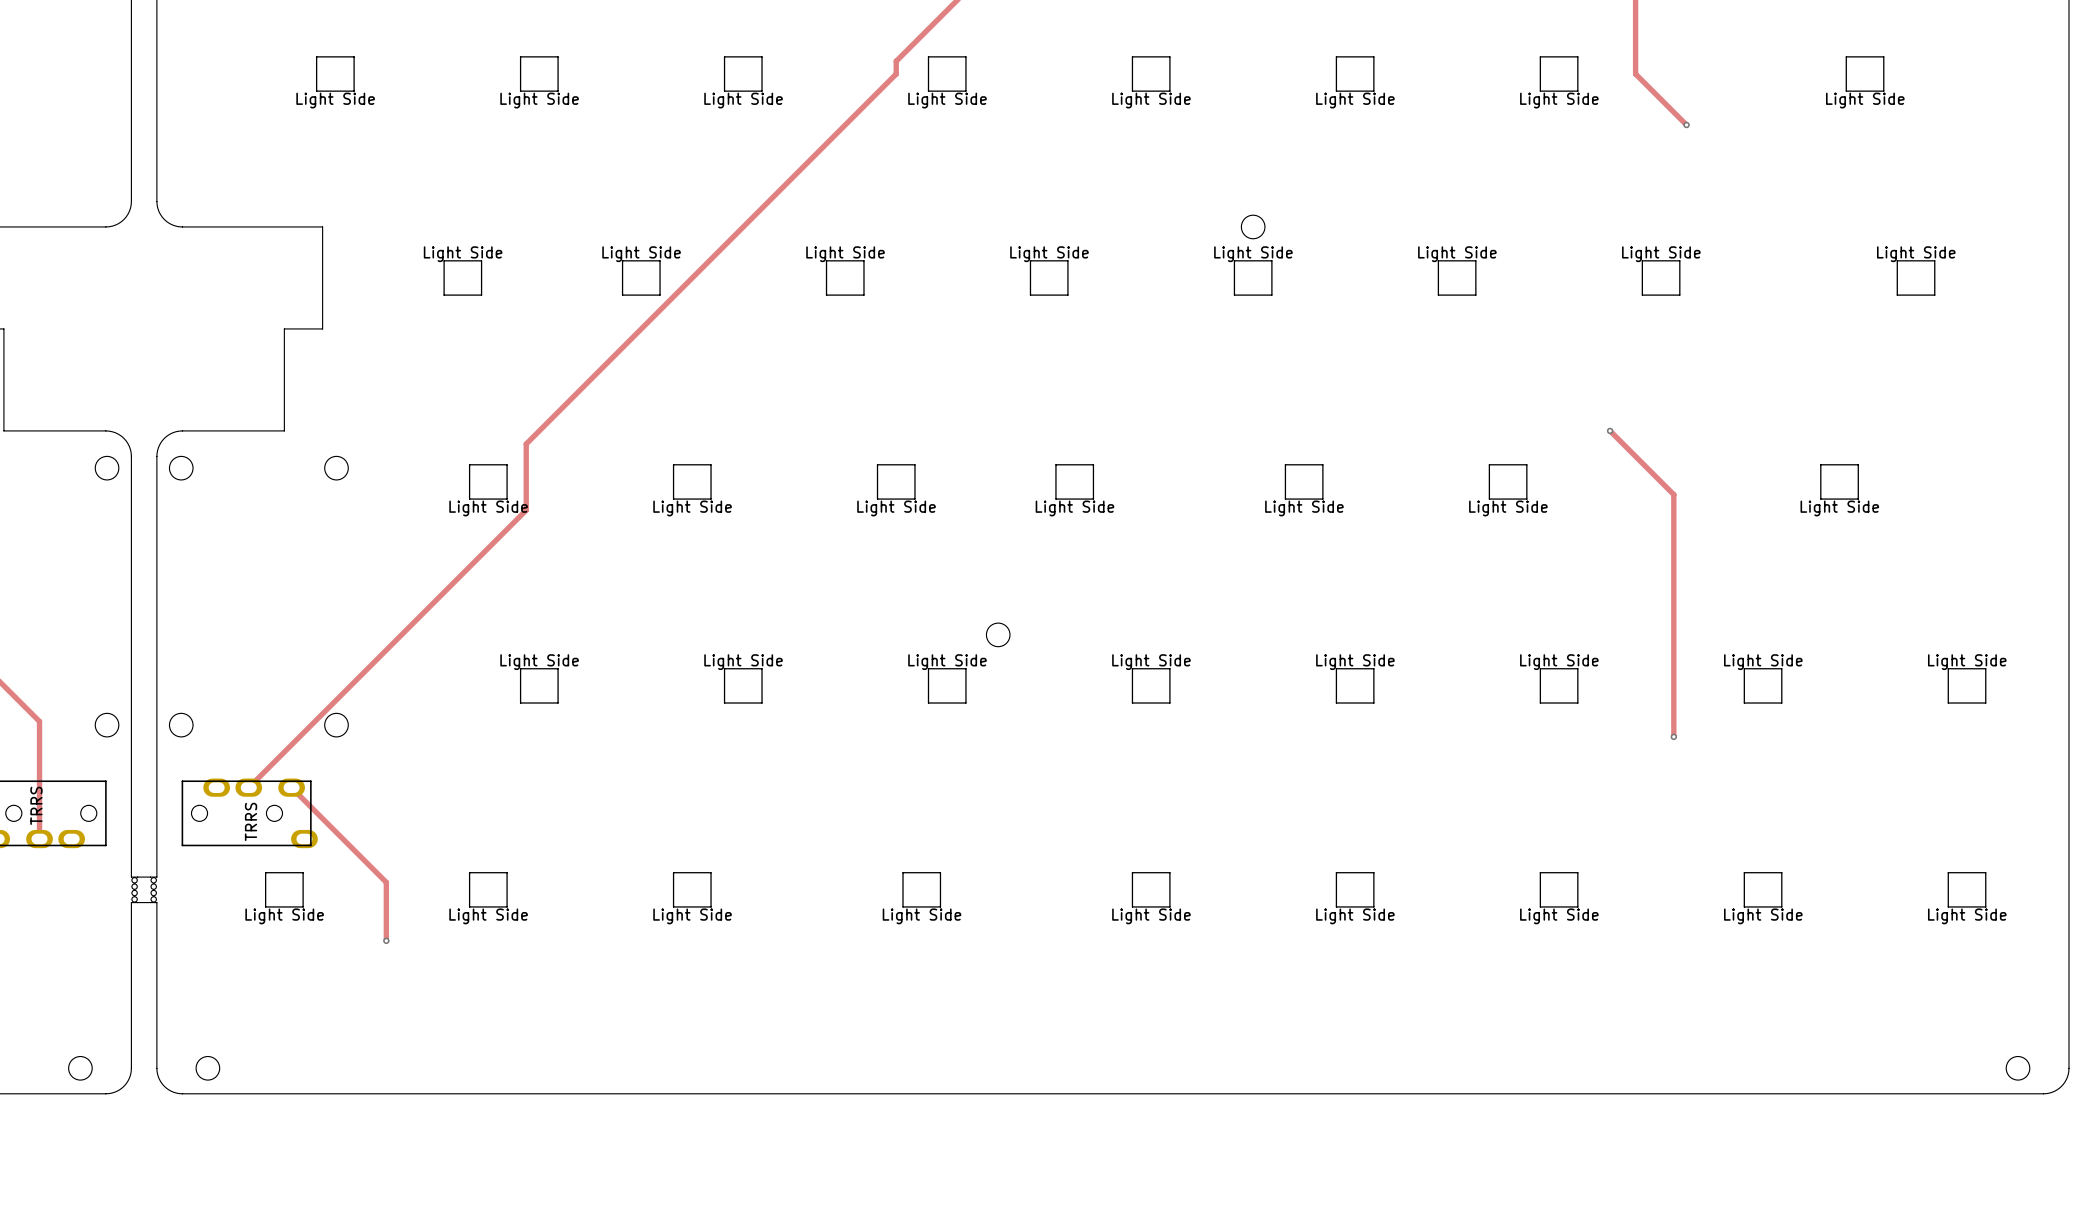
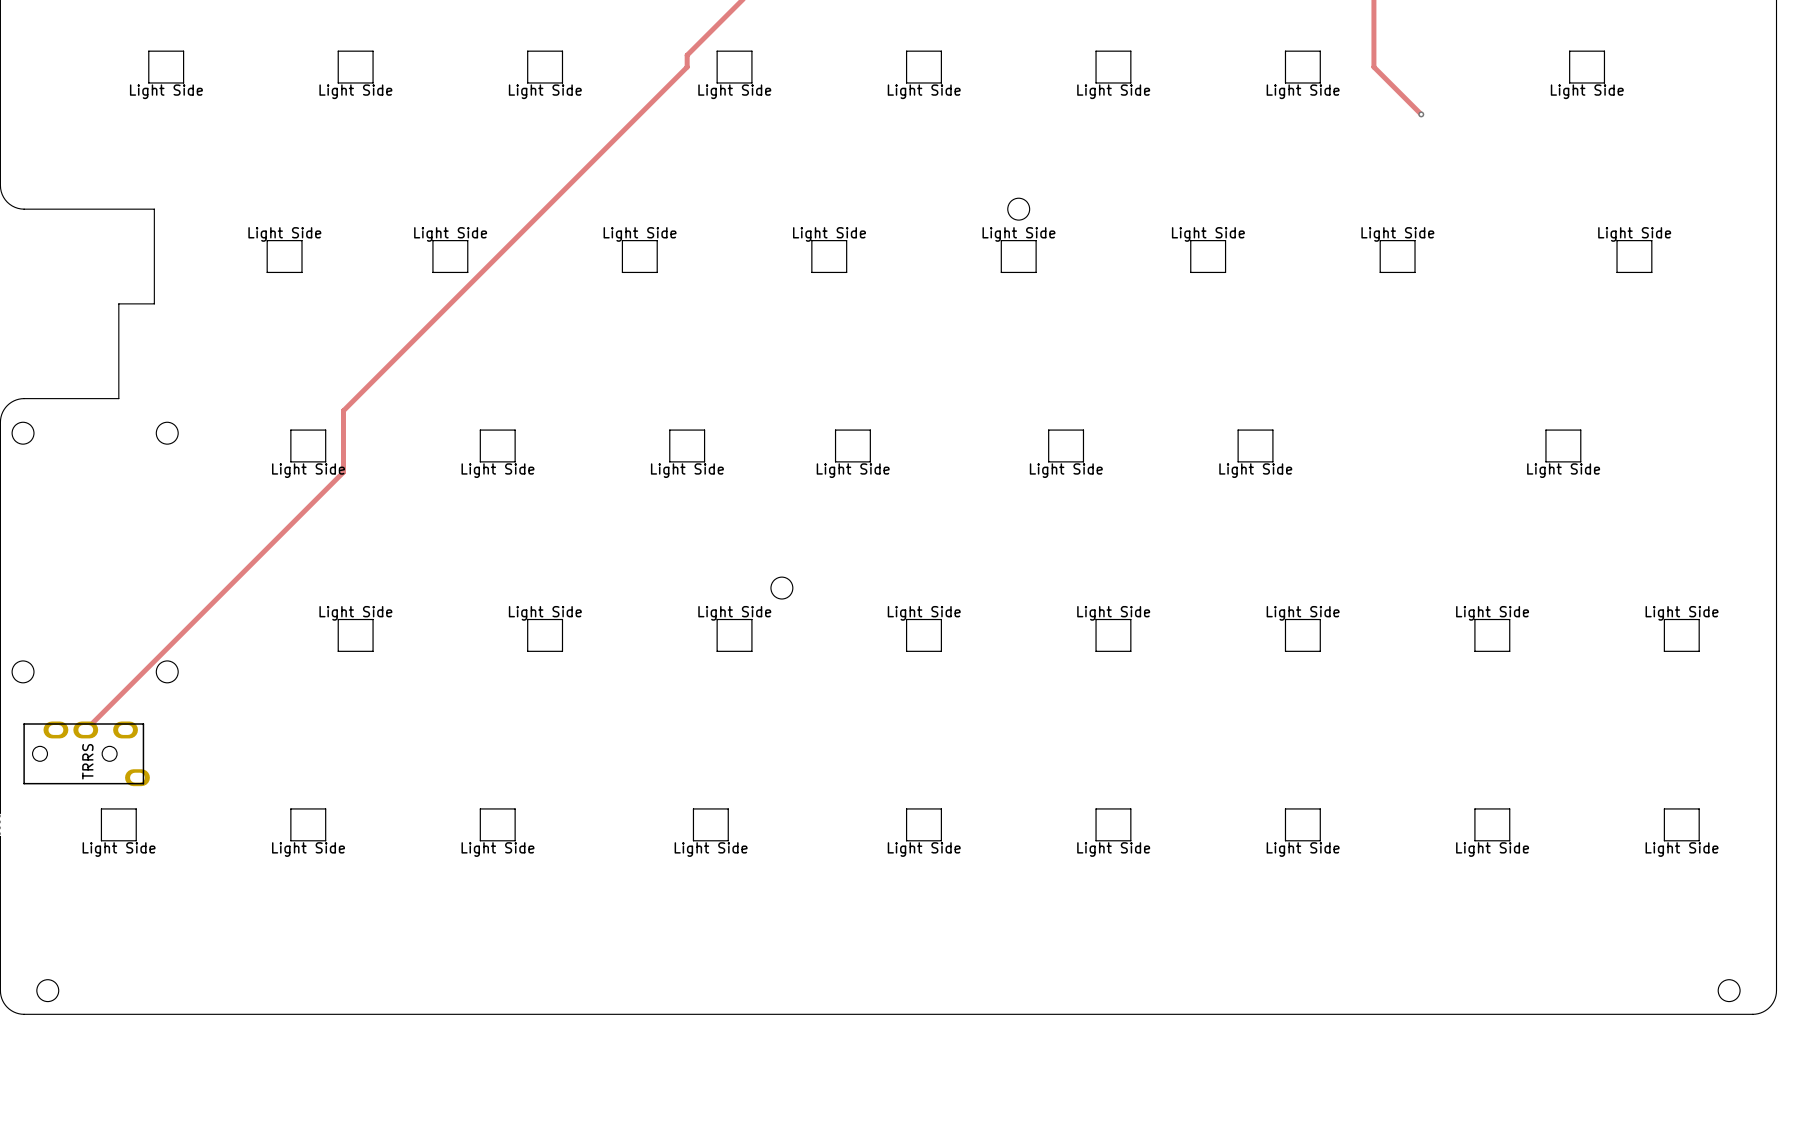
track: (1610, 430) (1673, 494) (1673, 736) -> none
via: (1610, 430) -> none
via: (1673, 736) -> none
track: (291, 787) (386, 882) (386, 940) -> none
via: (386, 940) -> none

